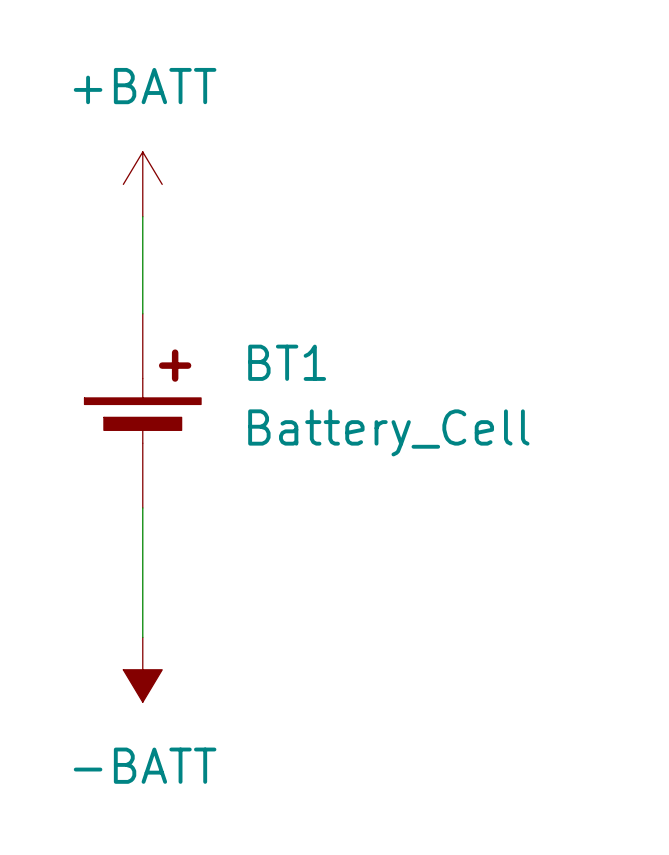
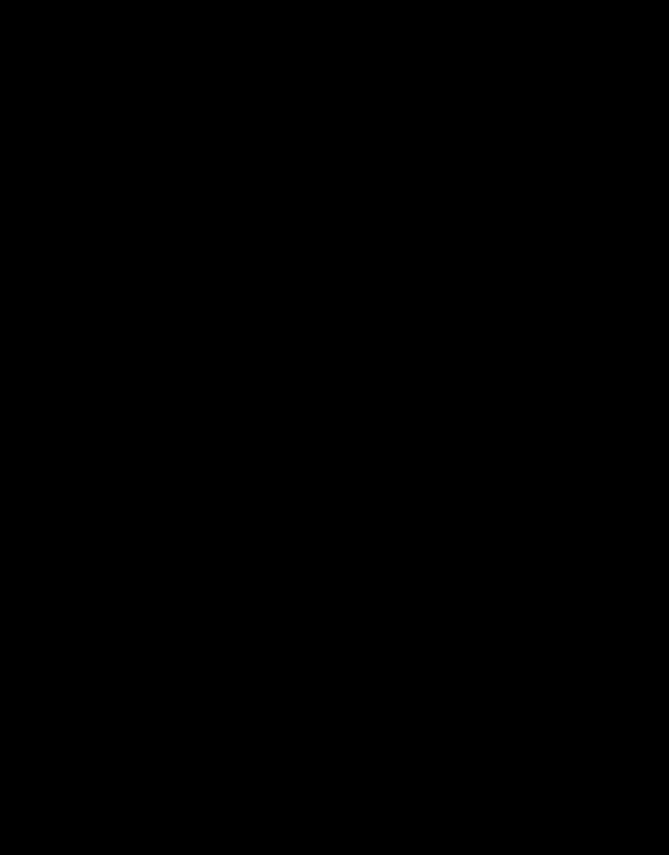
power symbol: +BATT (142, 184) -> none
wire: (142, 216) (142, 313) -> none
BT1: Battery_Cell (142, 410) -> none
wire: (142, 507) (142, 637) -> none
power symbol: -BATT (142, 669) -> none

